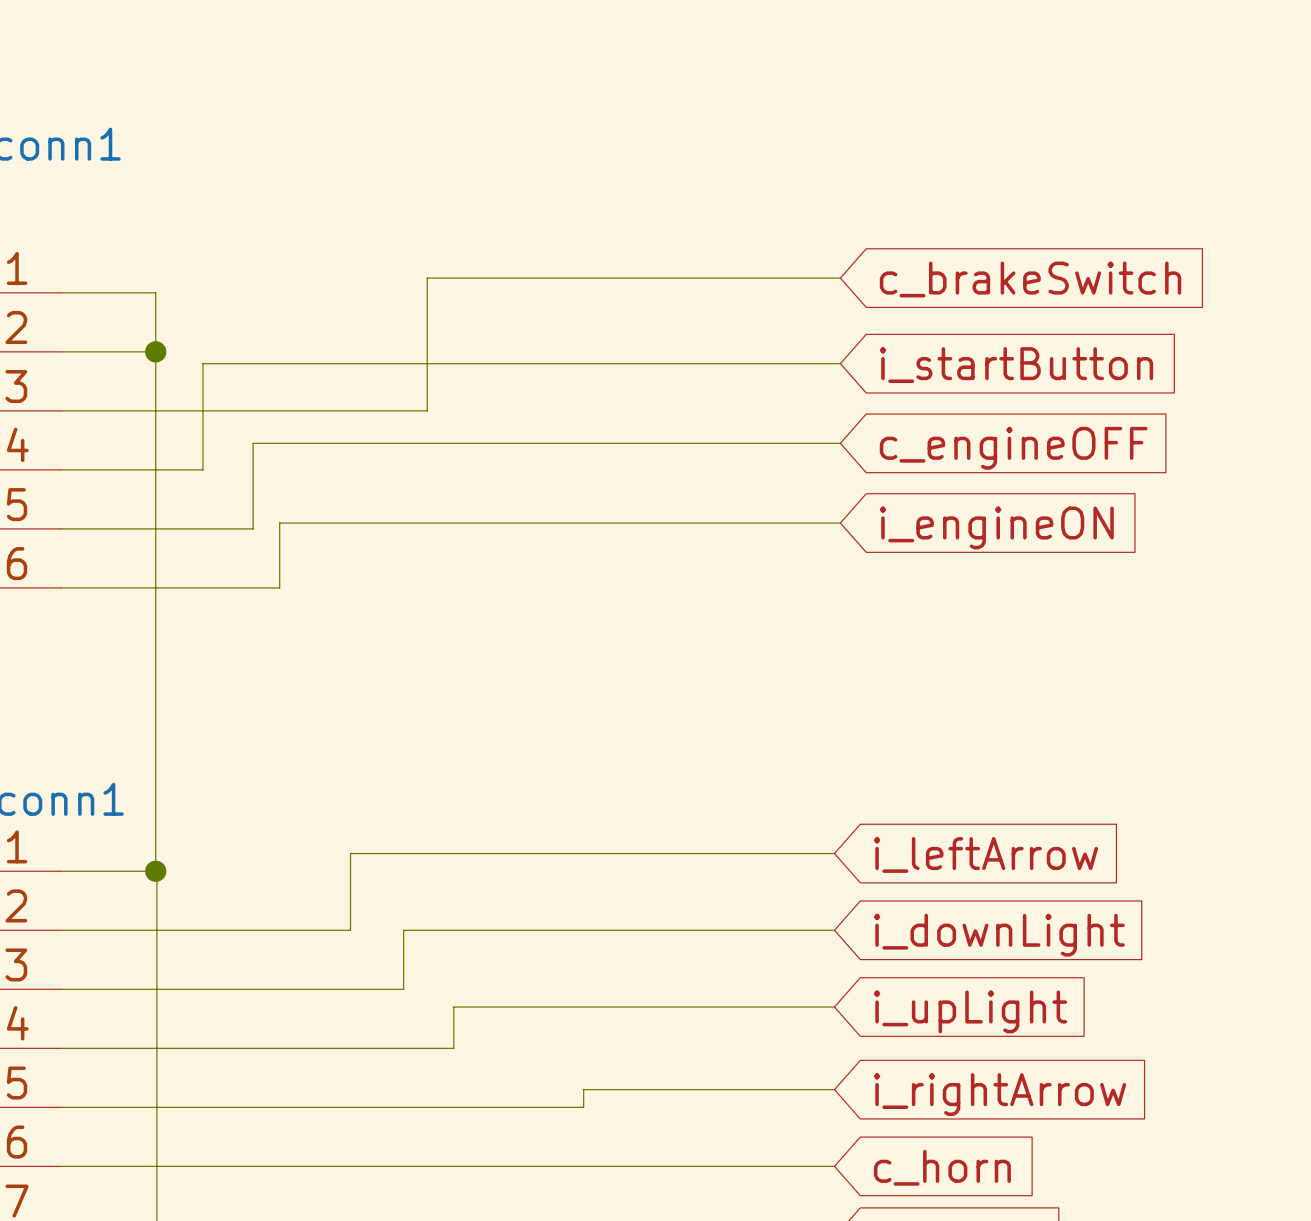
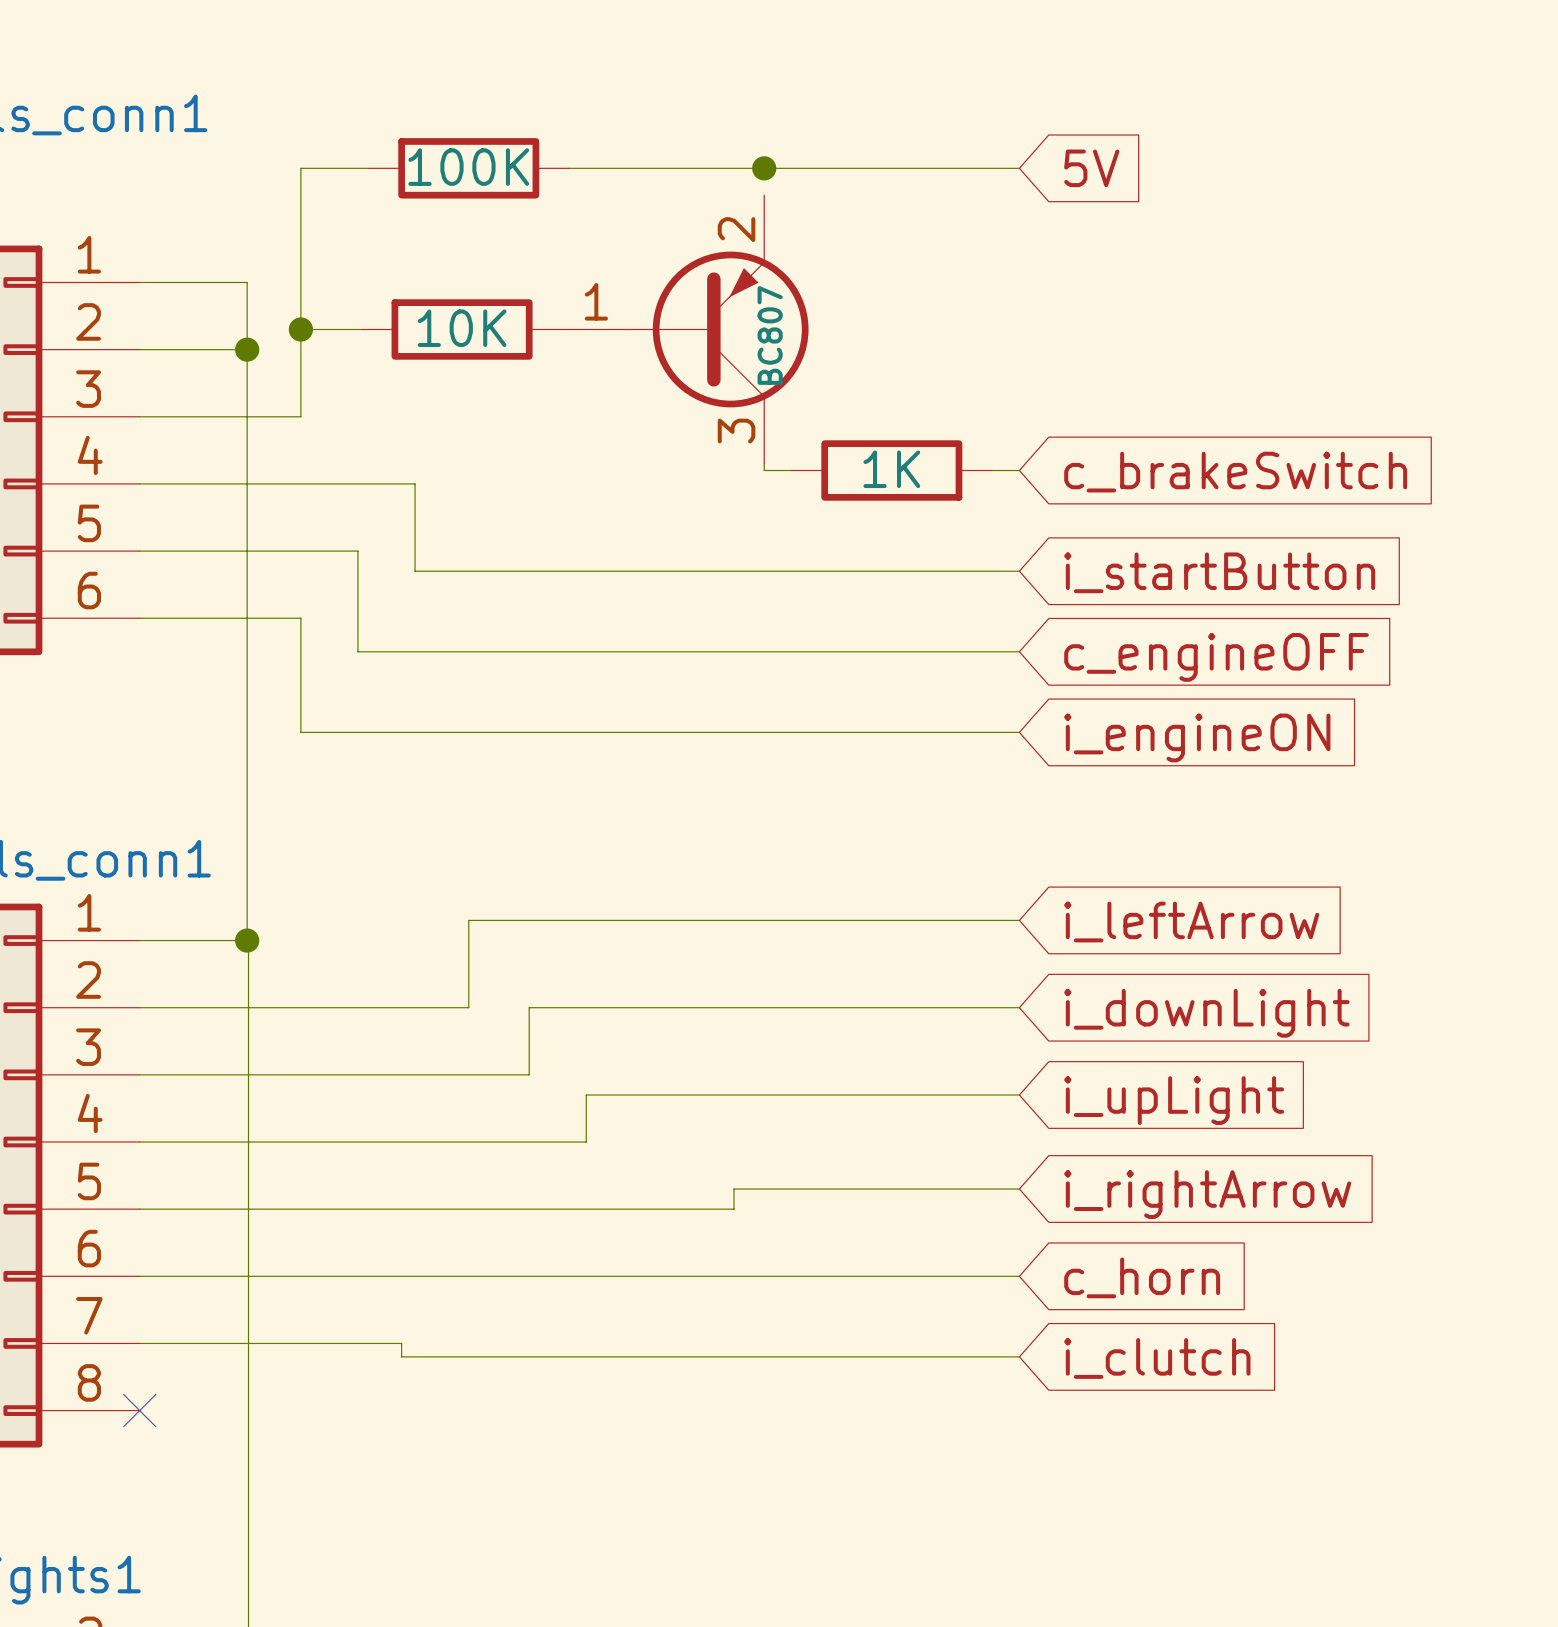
part: none -> 100K (468, 168)
wire: none -> (569, 168) (1019, 168)
junction: none -> (764, 168)
global label: none -> 5V (1091, 168)
wire: (840, 278) (427, 278) (427, 410) (202, 410) (202, 469) -> (1019, 571) (415, 571) (415, 483) (300, 483)
global label position: c_brakeSwitch (1030, 279) -> c_brakeSwitch (1235, 472)
wire: none -> (300, 329) (361, 329)
junction: none -> (300, 329)
part: none -> 10K (462, 329)
part: none -> BC807 (685, 329)
wire: (202, 363) (840, 363) -> (300, 363) (300, 168) (368, 168)
global label position: i_startButton (1016, 365) -> i_startButton (1219, 572)
wire: (840, 443) (253, 443) (253, 528) -> (1019, 651) (357, 651) (357, 551)
global label position: c_engineOFF (1013, 448) -> c_engineOFF (1216, 657)
wire: none -> (764, 463) (764, 470) (791, 470)
part: none -> 1K (891, 470)
wire: none -> (992, 470) (1019, 470)
wire: (840, 523) (279, 523) (279, 587) (202, 587) -> (1019, 732) (300, 732) (300, 618)
global label position: i_engineON (996, 527) -> i_engineON (1197, 737)

